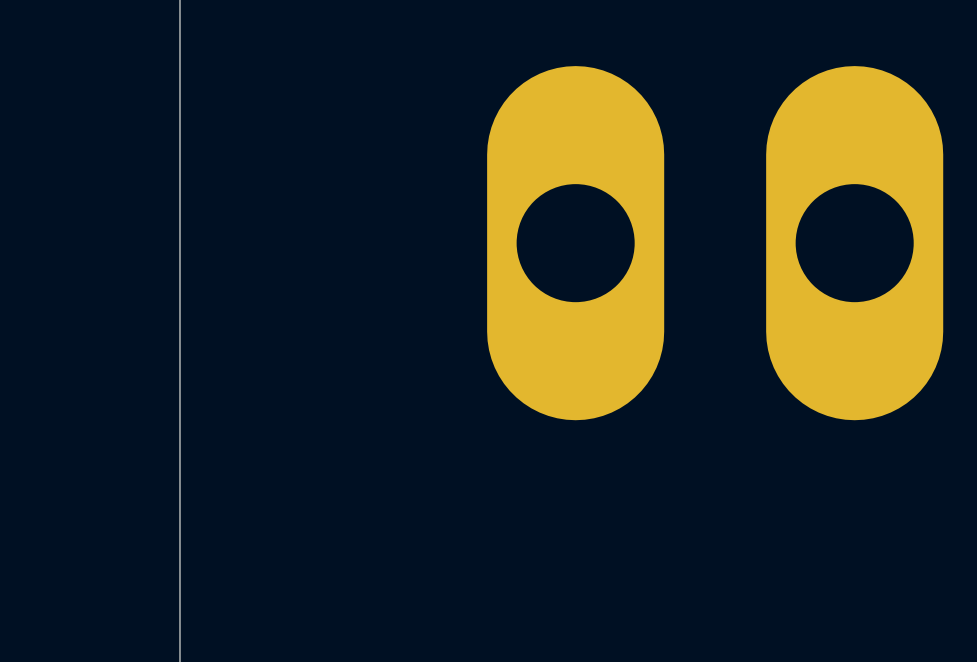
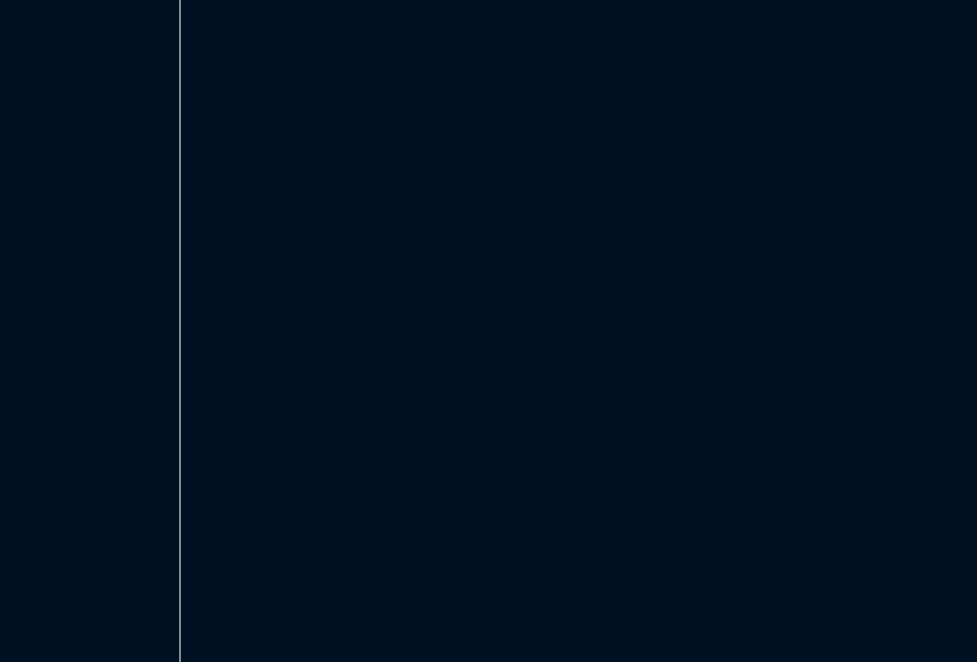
part: (715, 243) -> none

